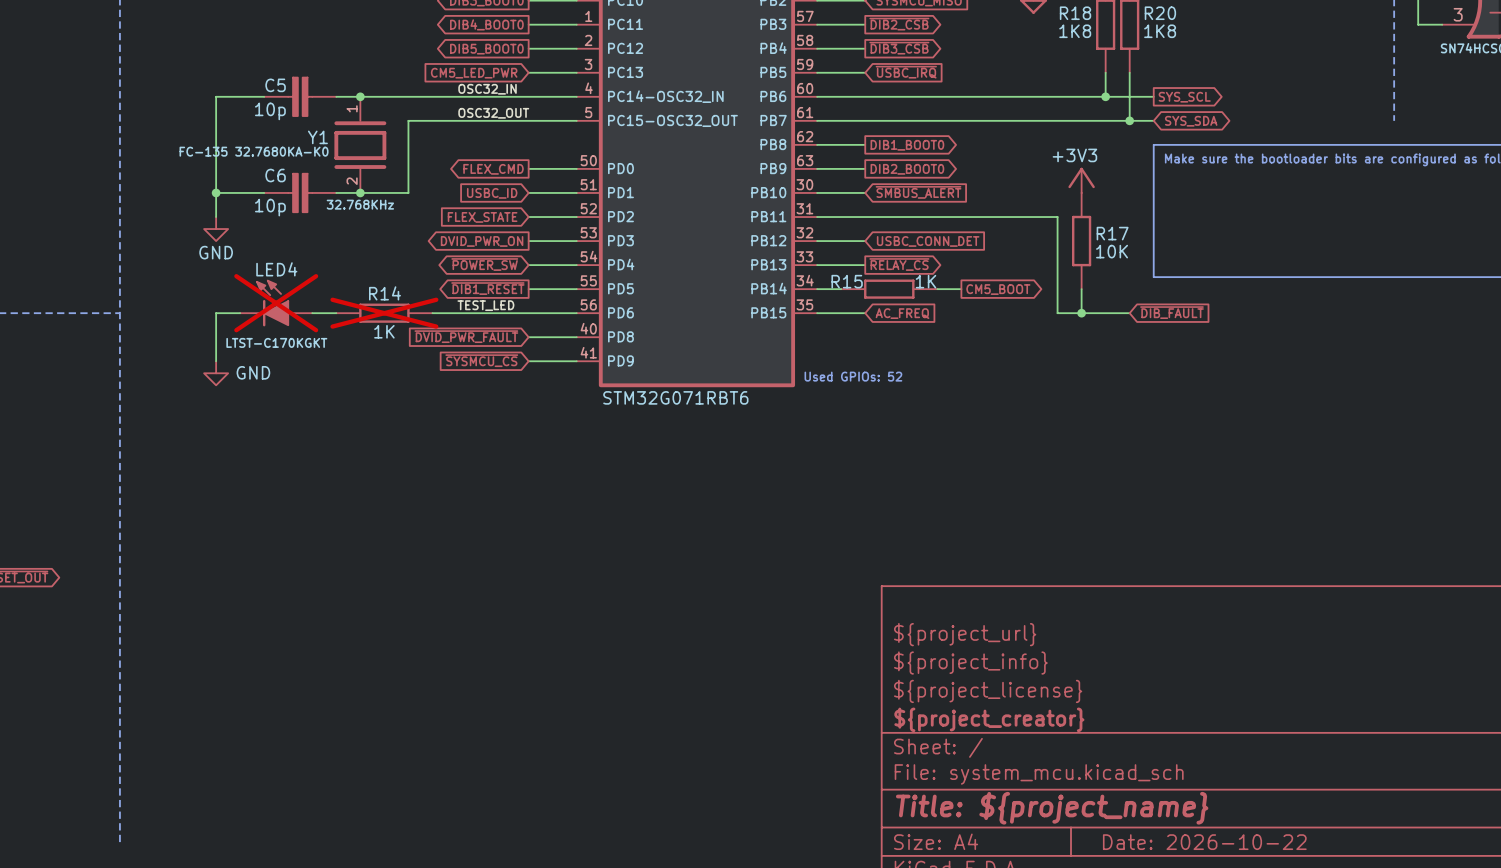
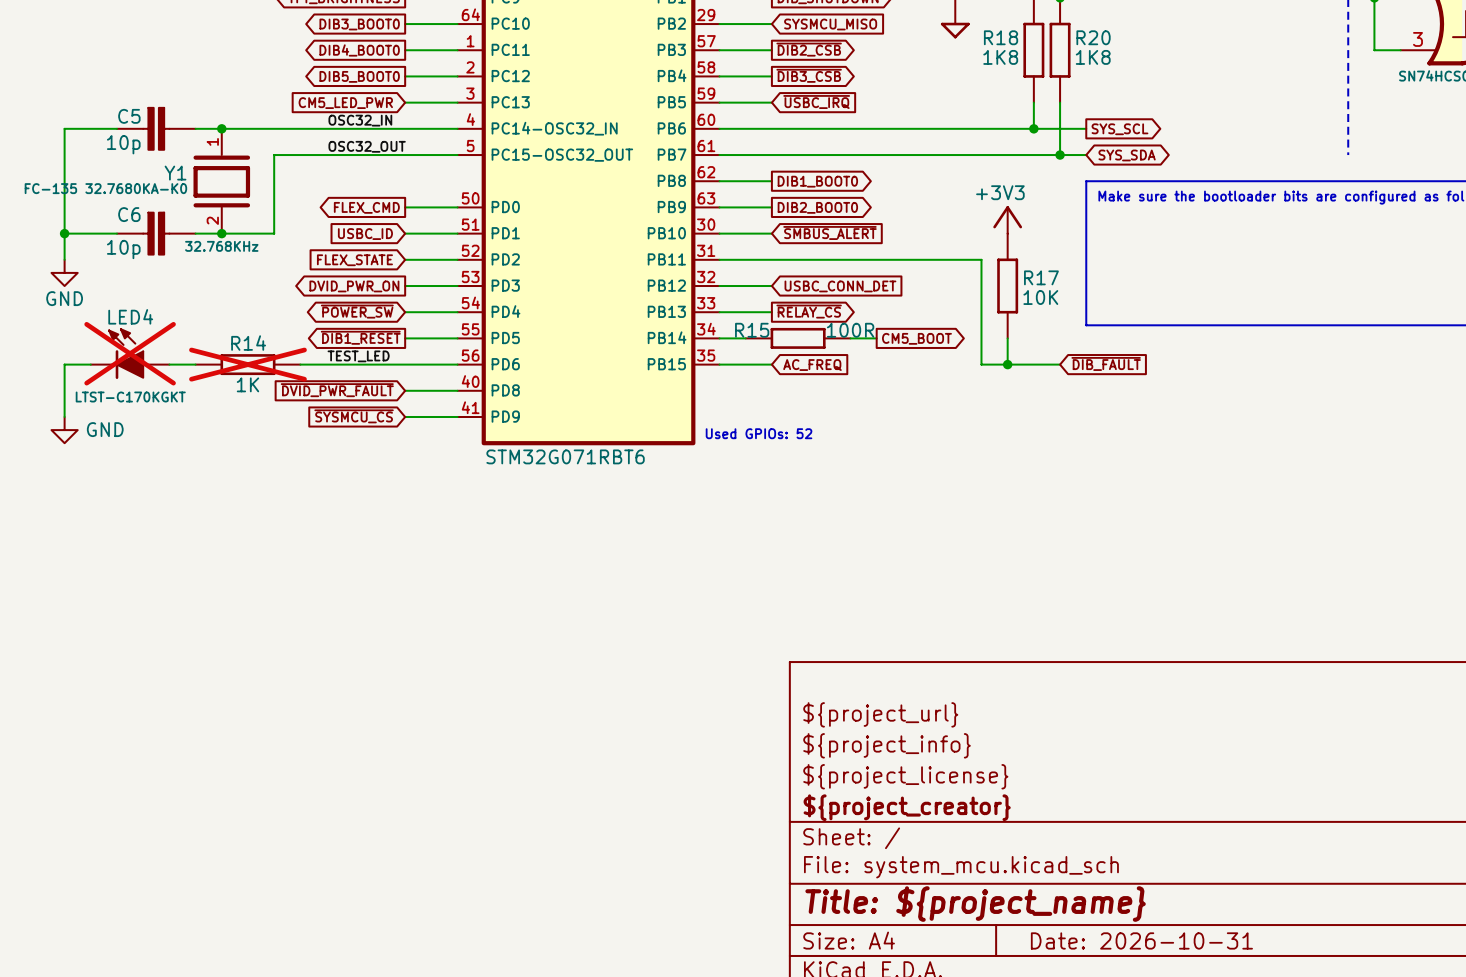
R15 value: 1K (926, 281) -> 100R (850, 330)
title block: Date: 2026-10-22 (1204, 842) -> Date: 2026-10-31 (1141, 940)

